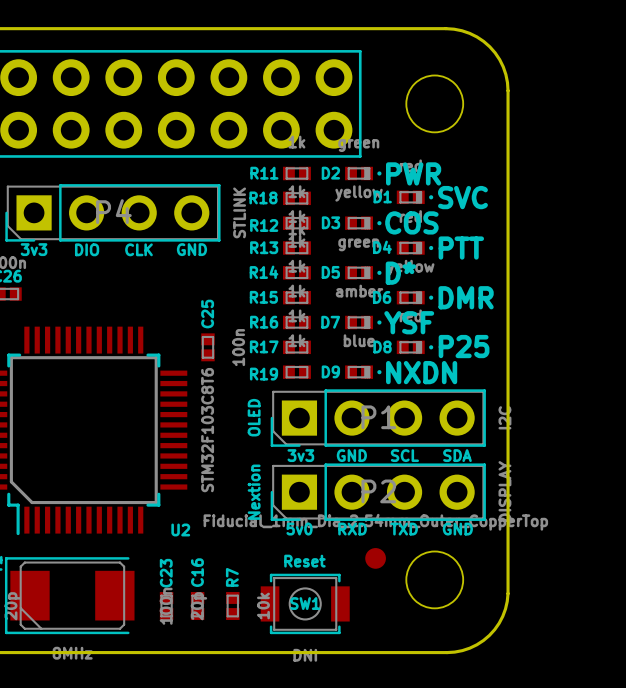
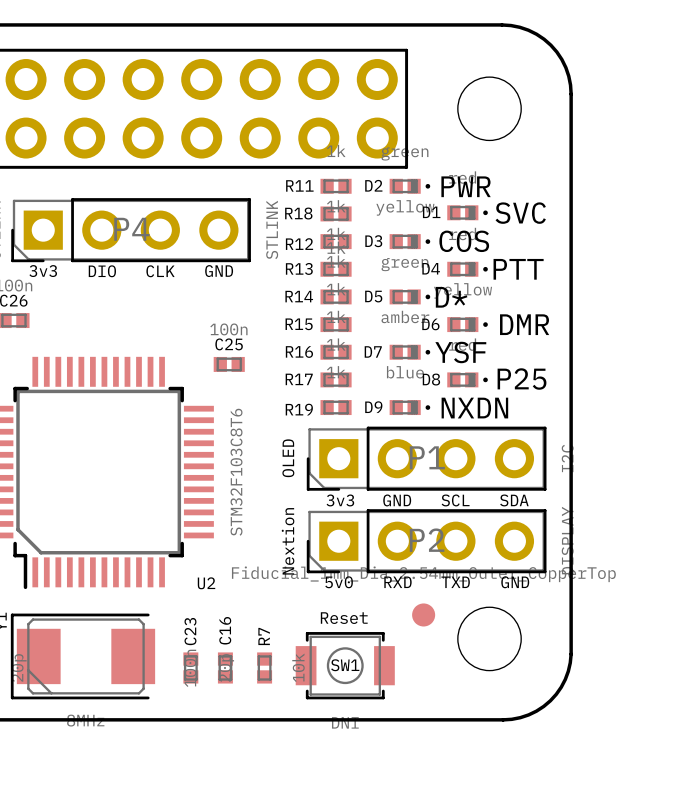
C25 rotation: 0° (207, 347) -> 90° clockwise (229, 364)
C25 value position: 100n (238, 347) -> 100n (228, 329)

